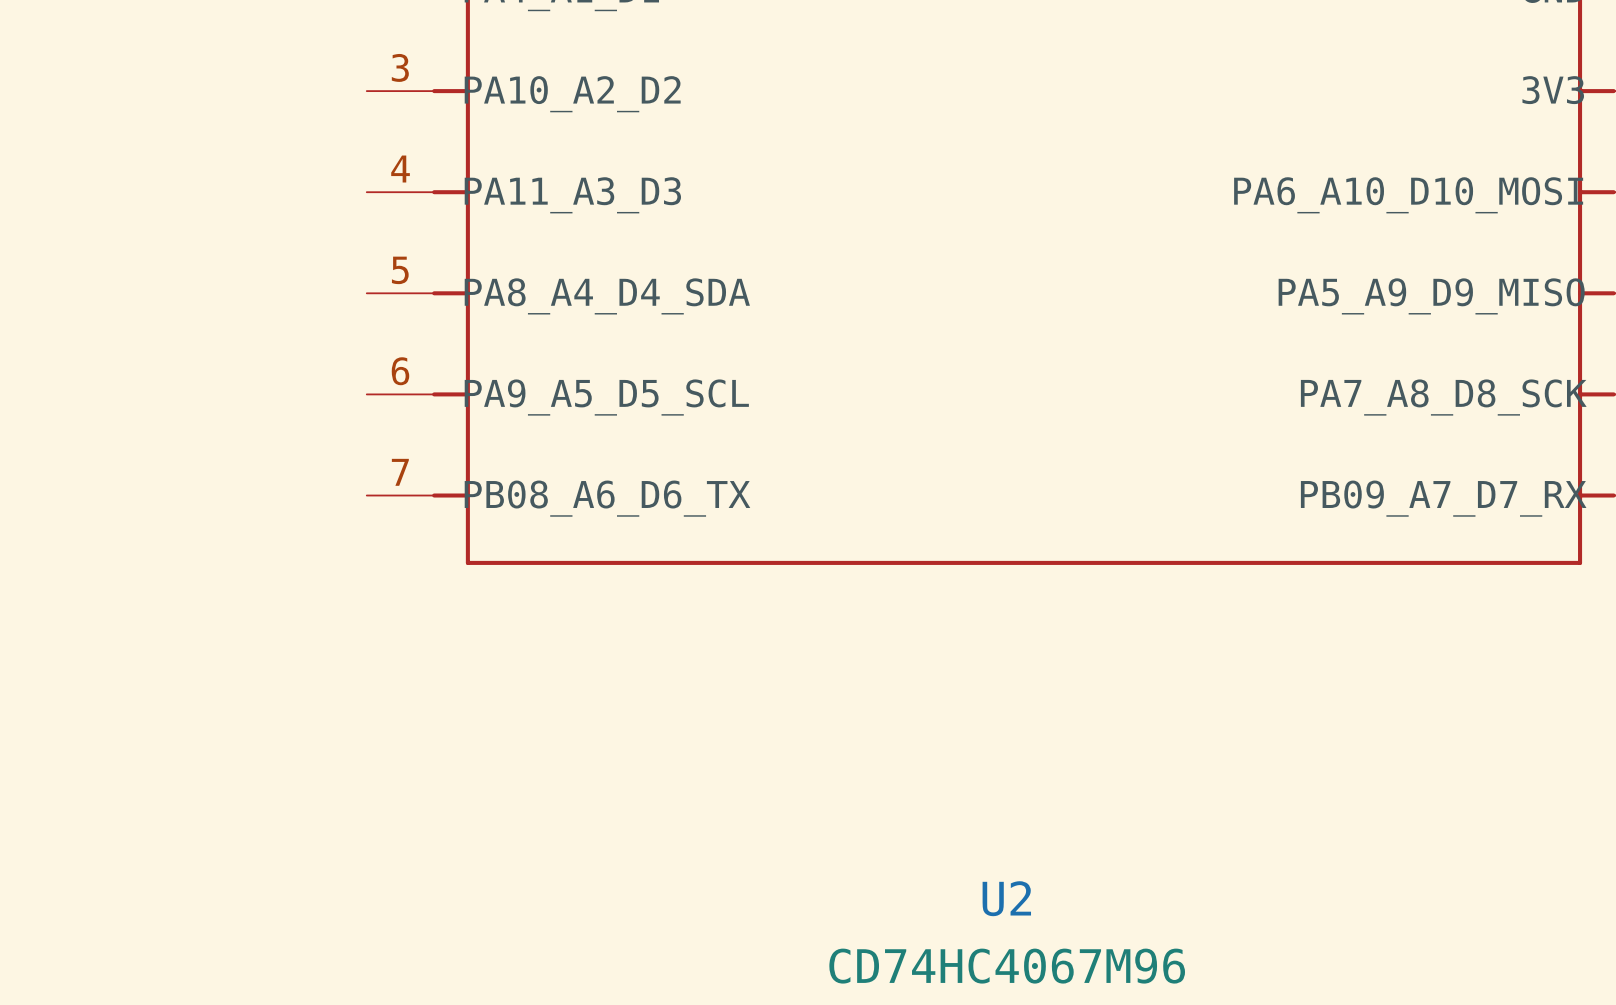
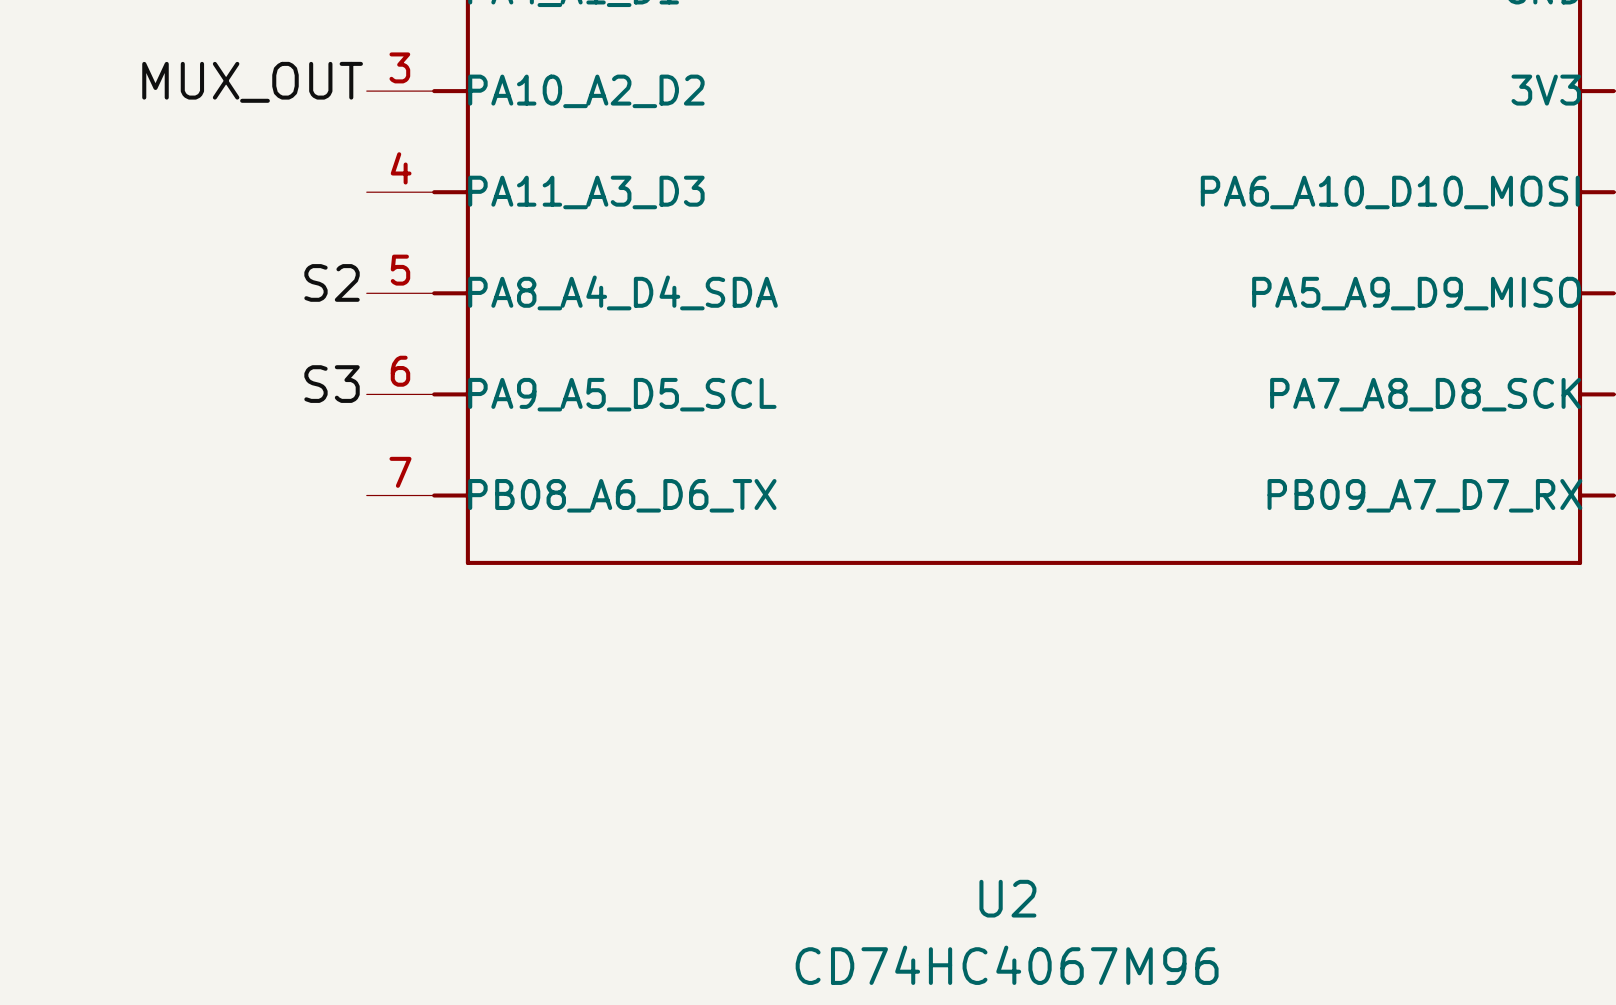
label: none -> MUX_OUT (252, 82)
label: none -> S2 (332, 282)
label: none -> S3 (332, 384)

